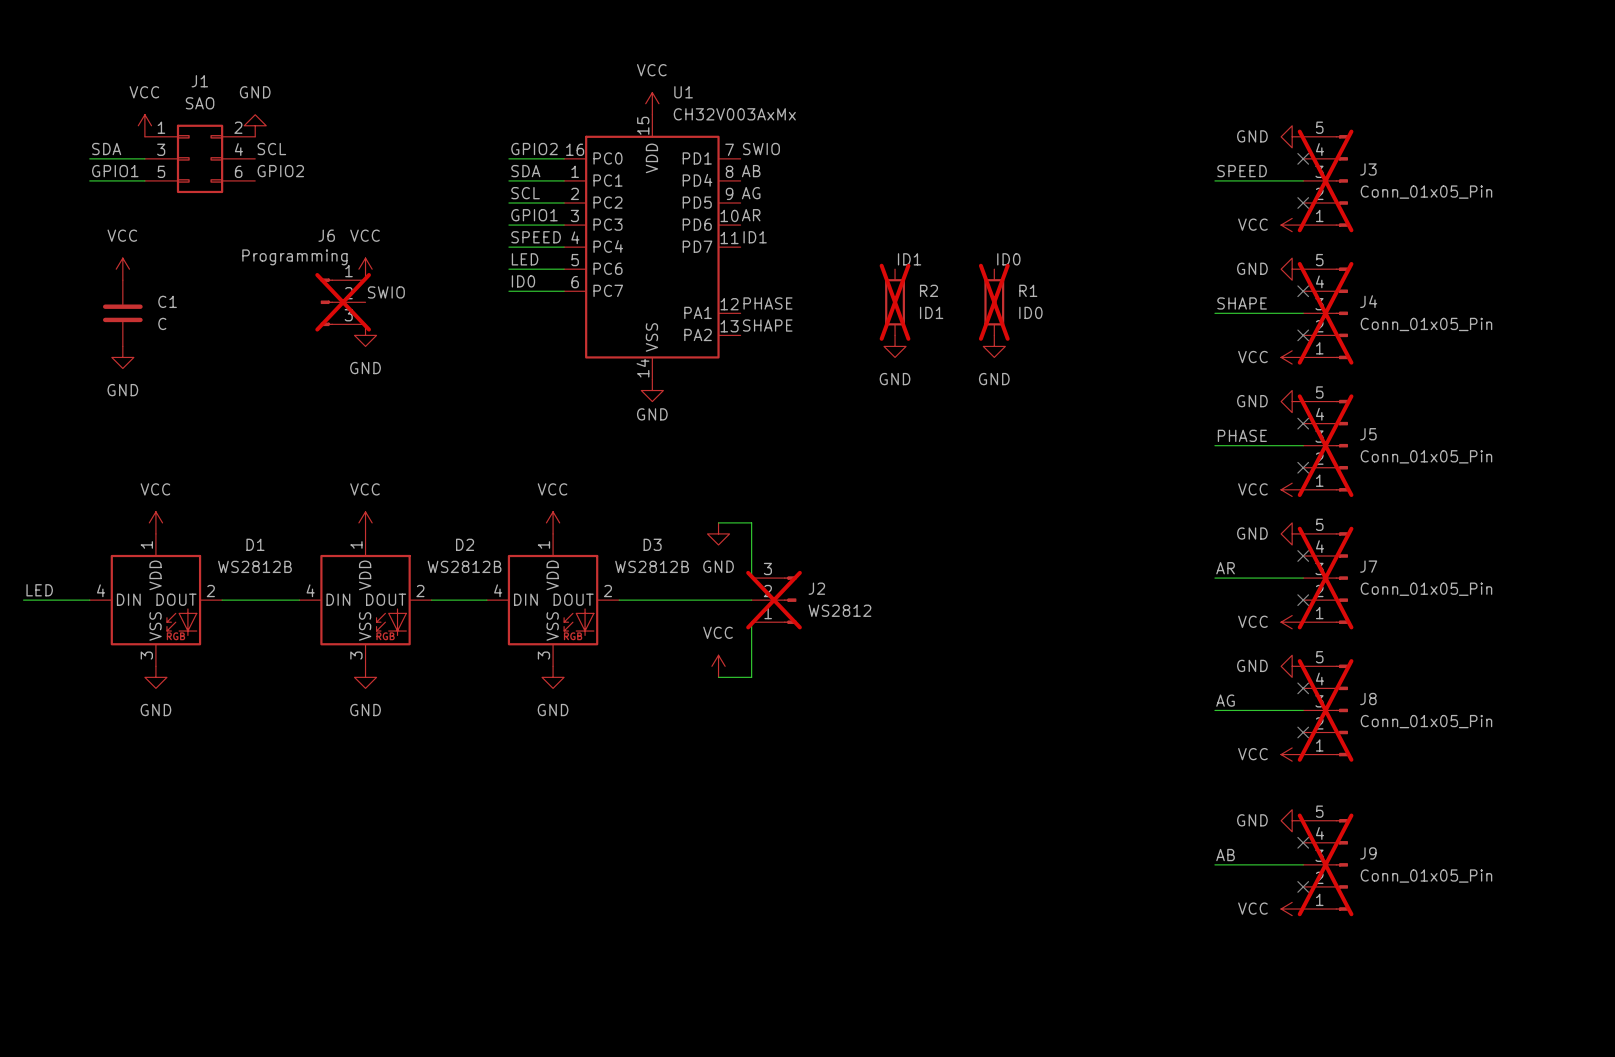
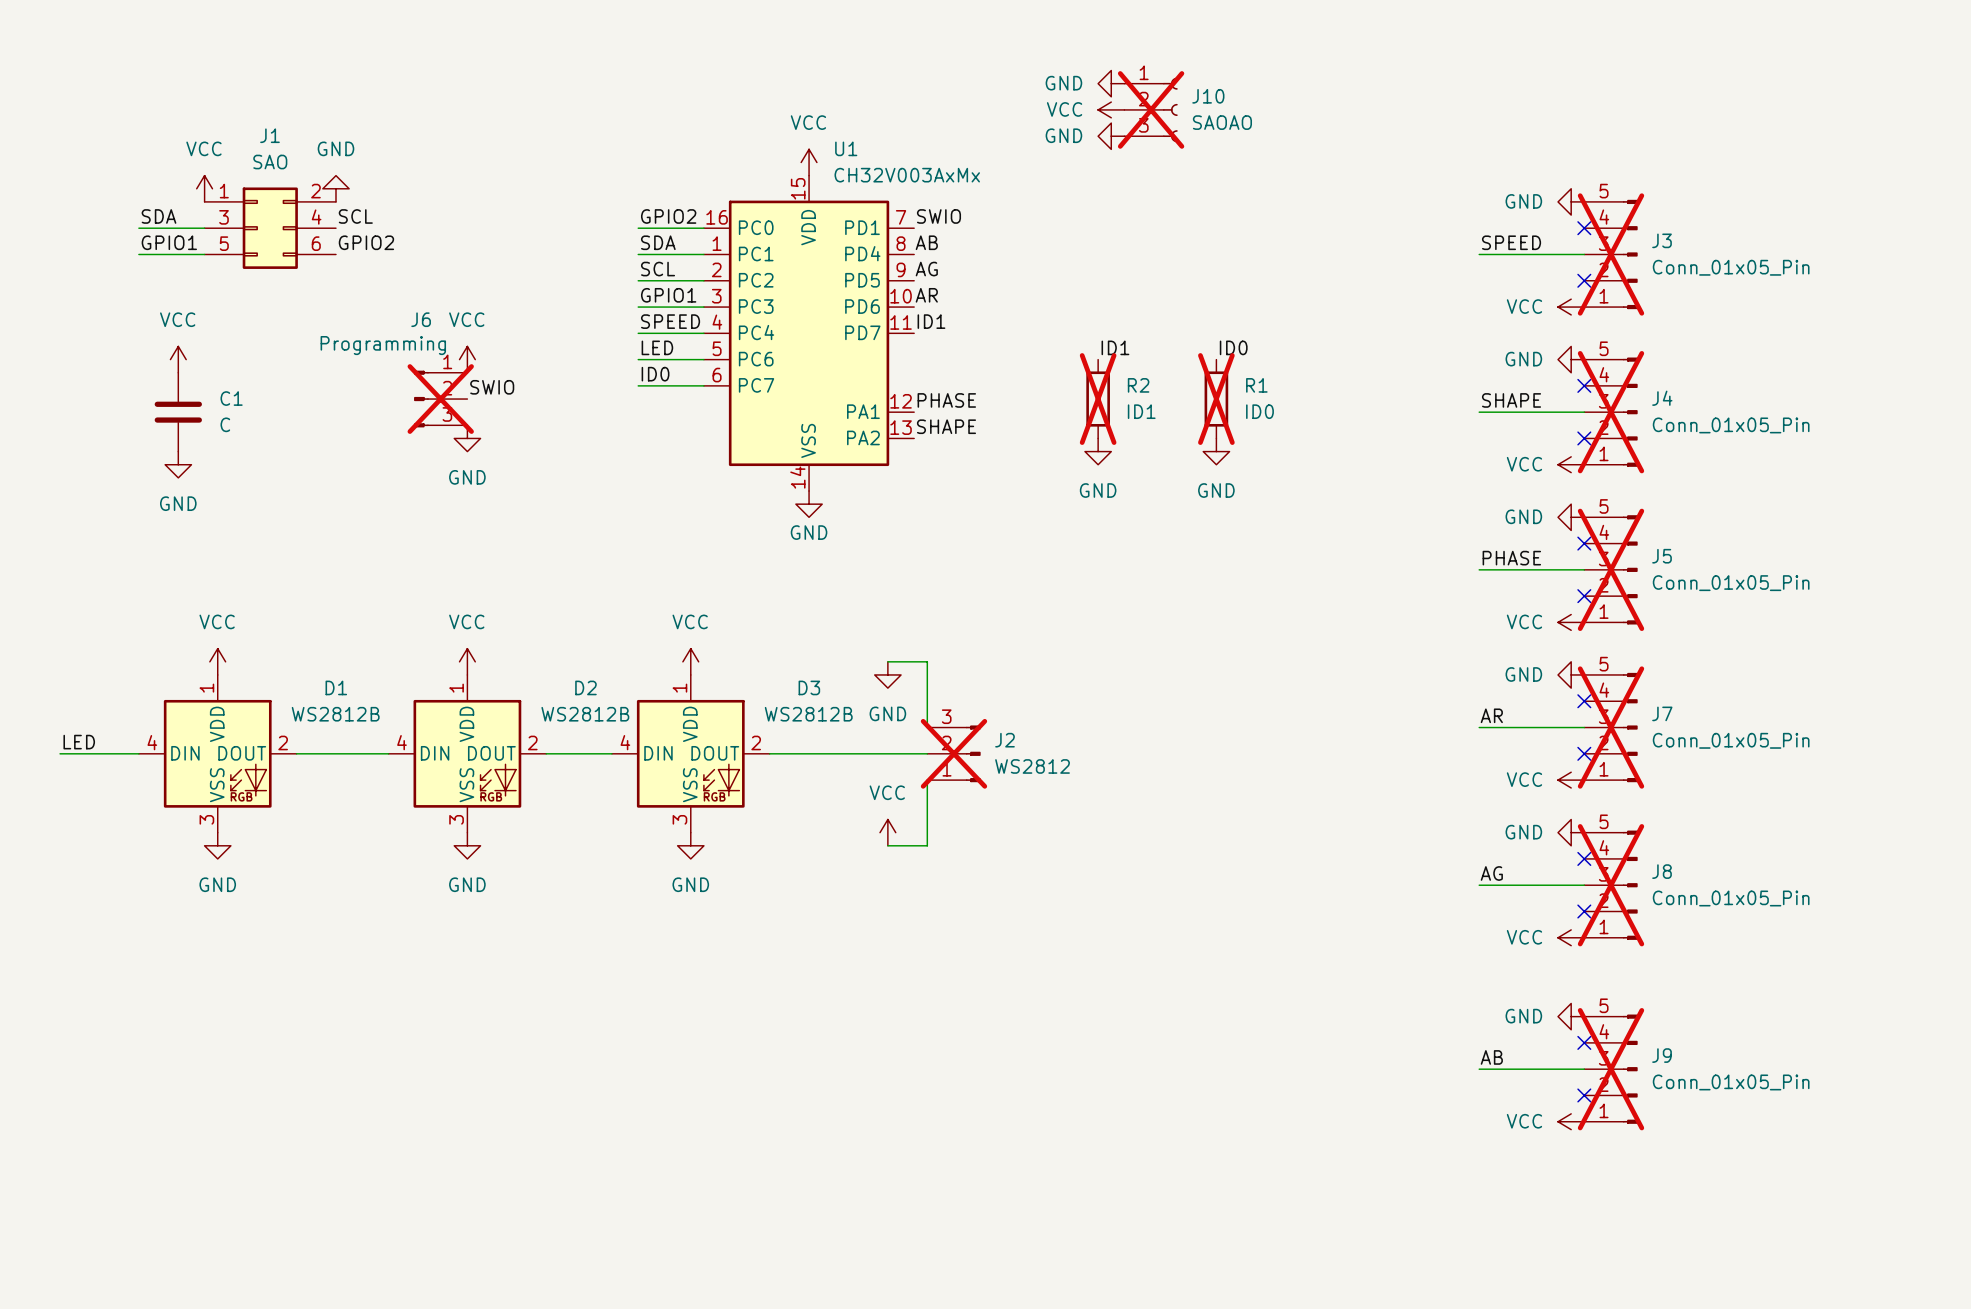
power symbol: none -> GND (1111, 83)
power symbol: none -> VCC (1111, 109)
J10: none -> SAOAO (1151, 109)
power symbol: none -> GND (1111, 136)

